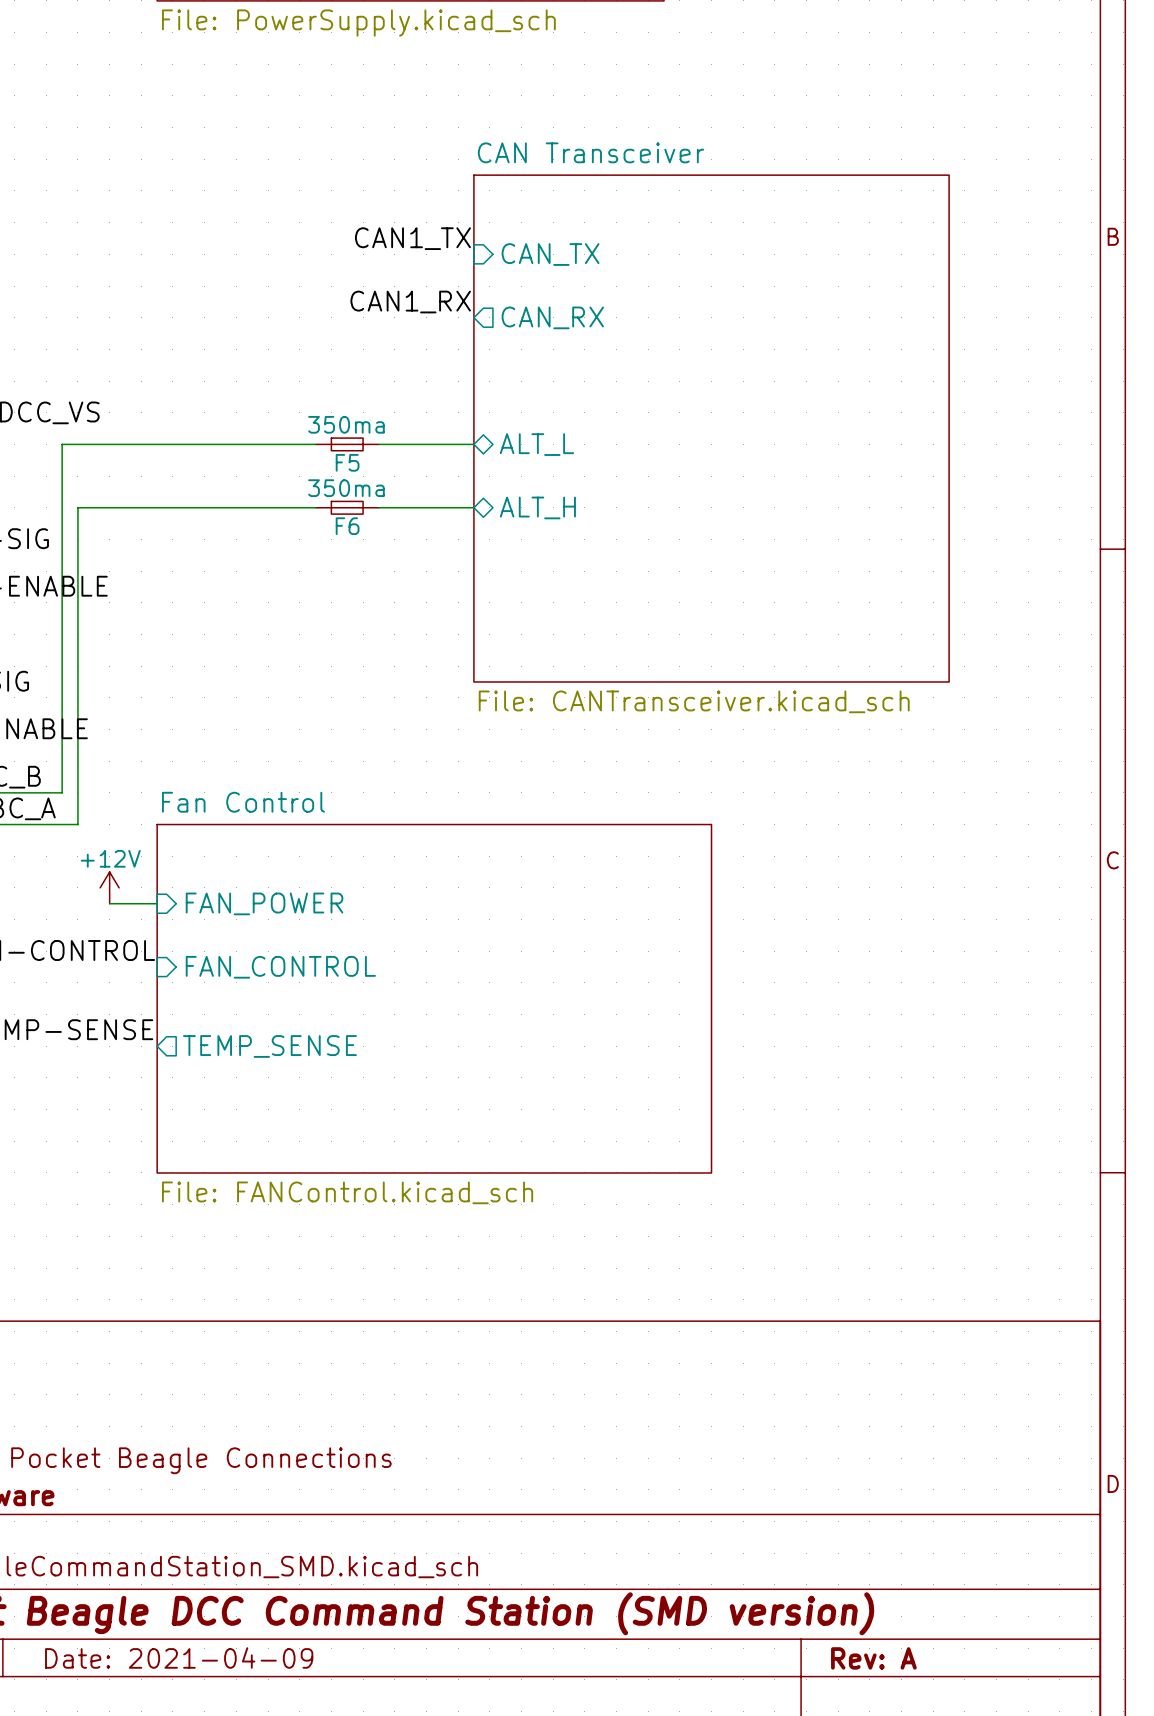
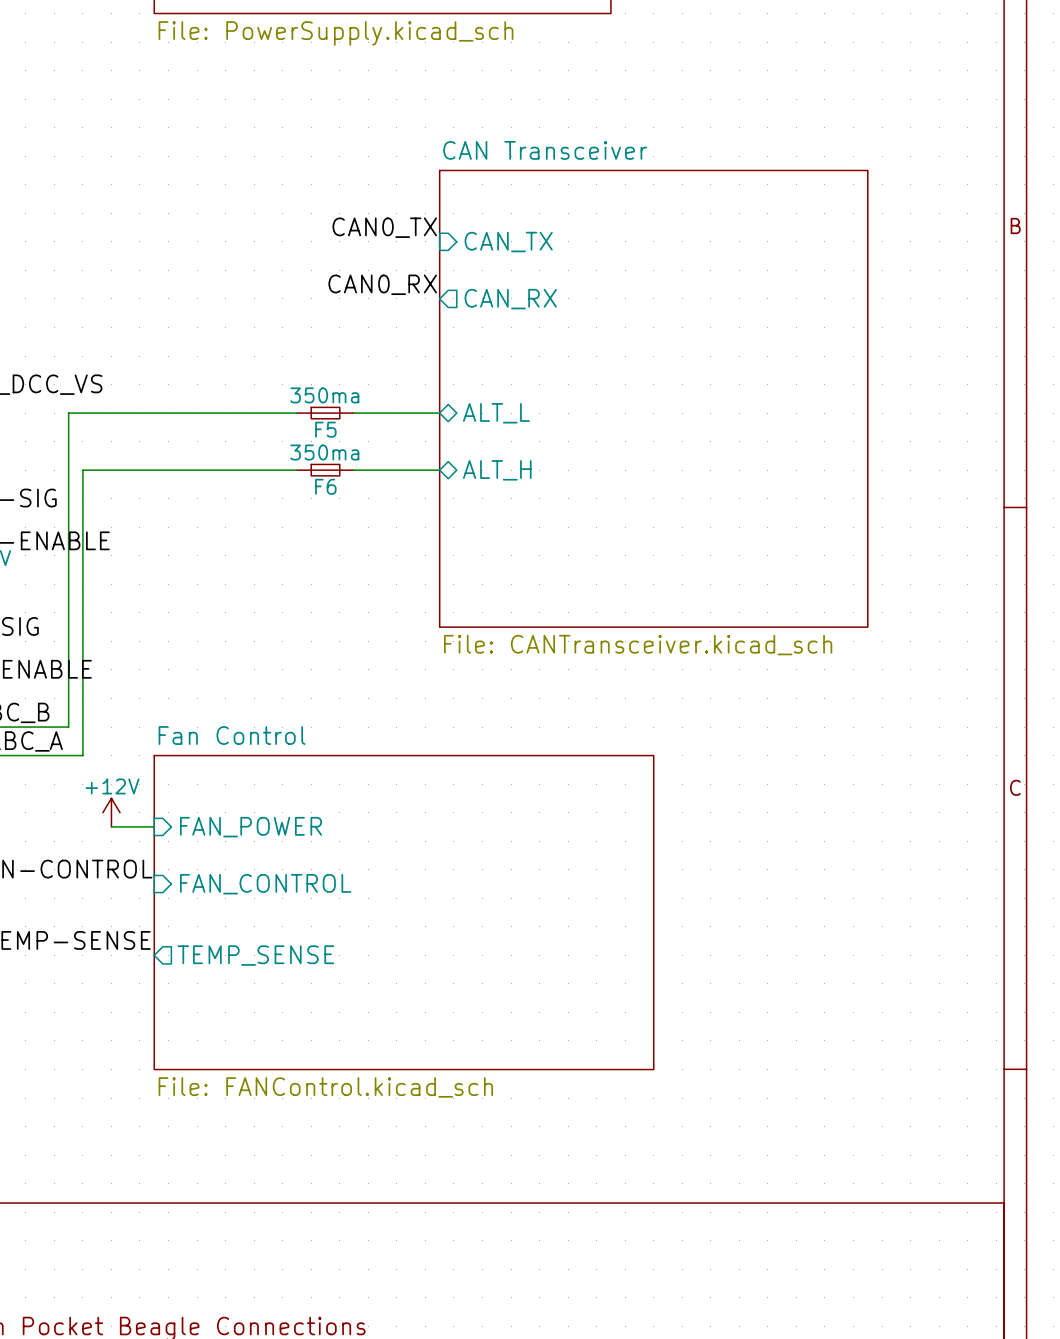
label: CAN1_TX (412, 238) -> CAN0_TX (384, 227)
label: CAN1_RX (410, 302) -> CAN0_RX (382, 284)

